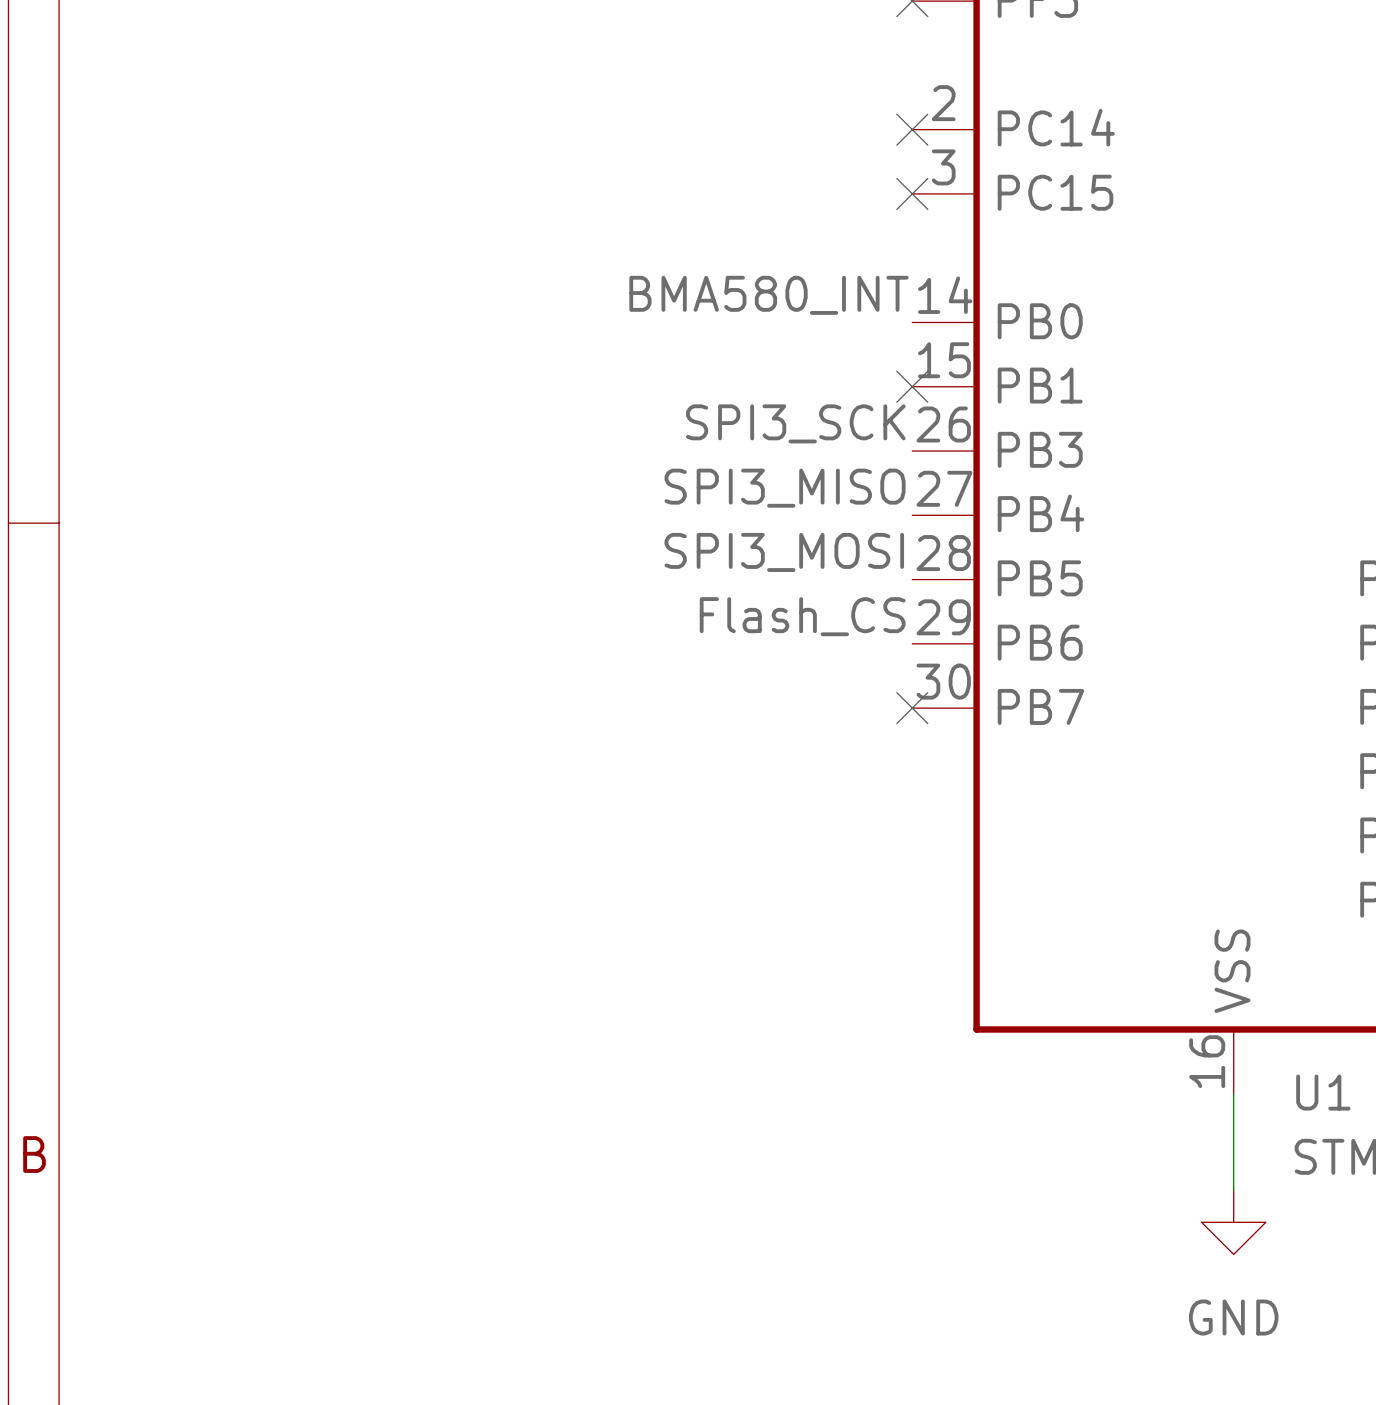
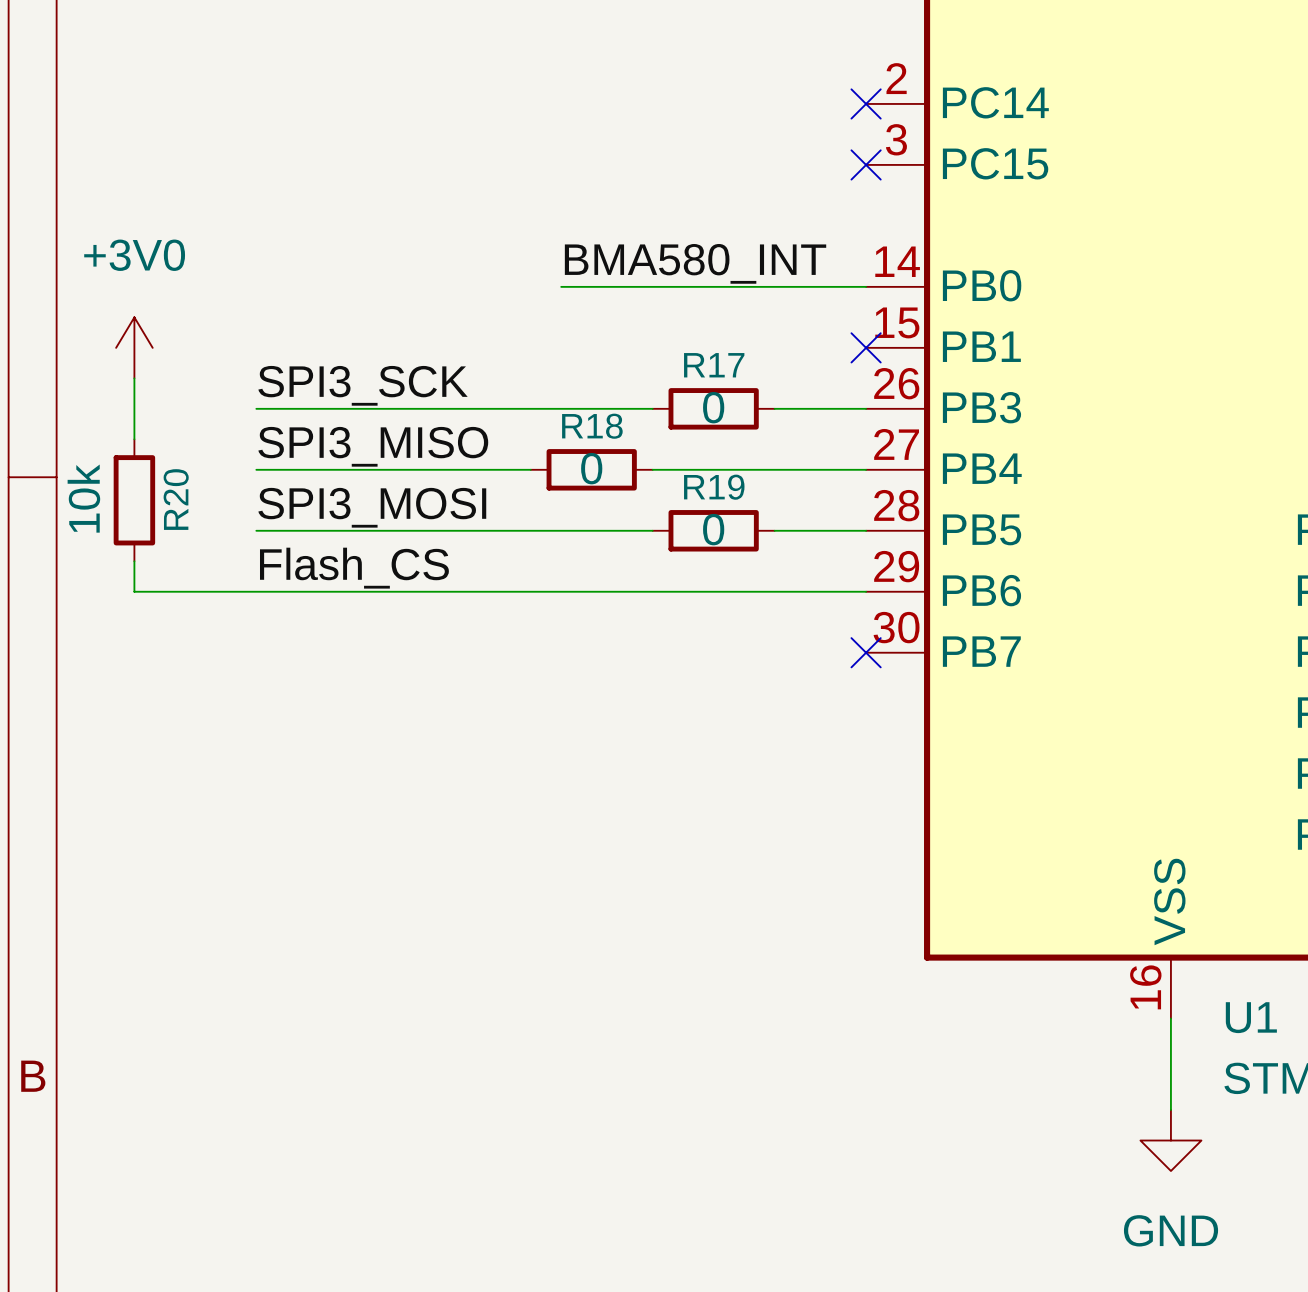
label position: BMA580_INT (769, 295) -> BMA580_INT (695, 263)
wire: none -> (561, 286) (866, 286)
power symbol: none -> +3V0 (134, 347)
wire: none -> (134, 378) (134, 439)
label: none -> SPI3_SCK (363, 385)
label: SPI3_SCK (795, 423) -> none
wire: none -> (256, 408) (652, 408)
R17: none -> 0 (713, 408)
wire: none -> (774, 408) (866, 408)
label: none -> SPI3_MISO (373, 446)
label: SPI3_MISO (785, 488) -> none
wire: none -> (256, 469) (530, 469)
R18: none -> 0 (591, 469)
wire: none -> (652, 469) (866, 469)
R20: none -> 10k (134, 500)
label: none -> SPI3_MOSI (372, 507)
label: SPI3_MOSI (784, 552) -> none
wire: none -> (256, 530) (652, 530)
R19: none -> 0 (713, 530)
wire: none -> (774, 530) (866, 530)
wire: none -> (134, 561) (134, 591) (866, 591)
label: none -> Flash_CS (354, 568)
label: Flash_CS (802, 616) -> none

